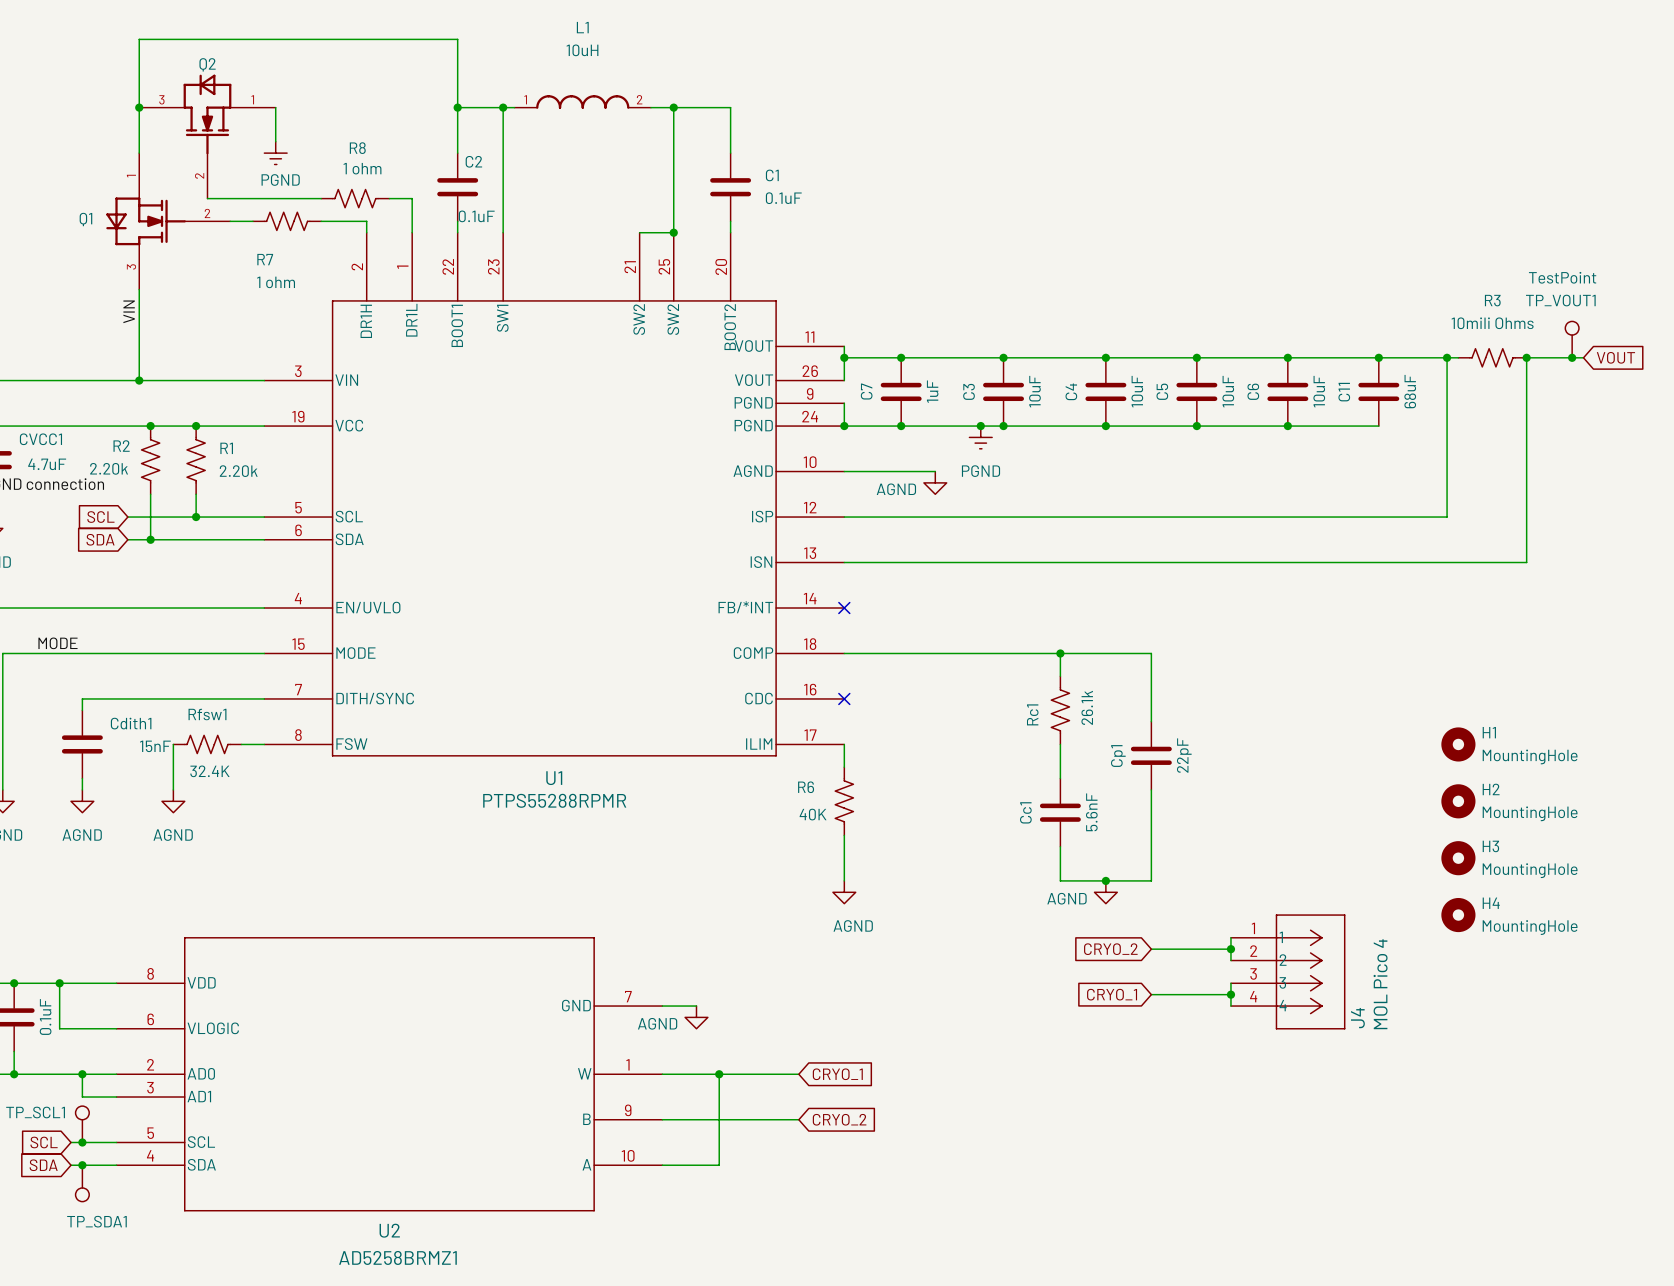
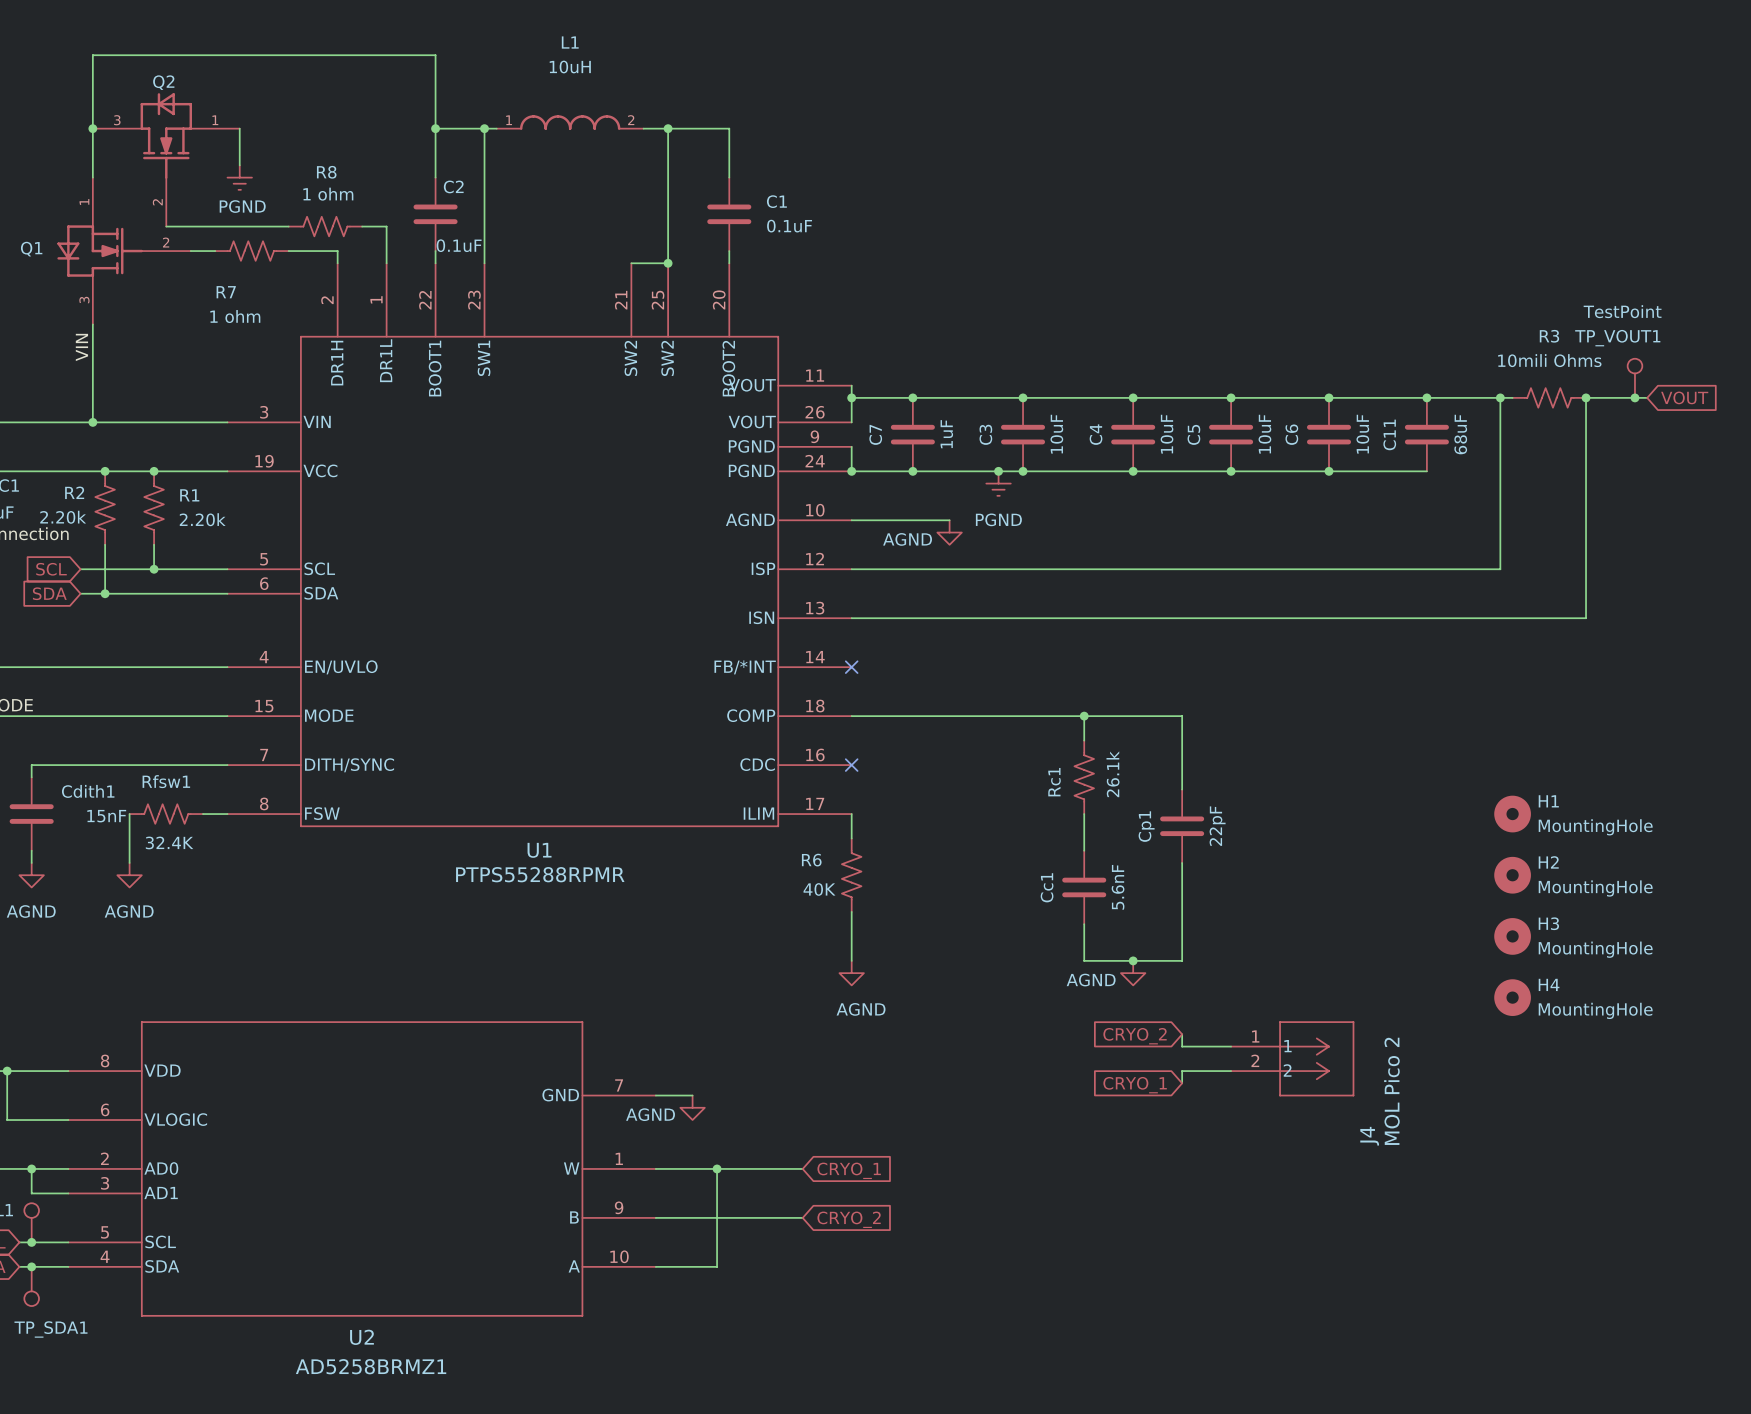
J4 symbol: [1230, 914, 1346, 1030] -> [1231, 1021, 1355, 1097]
wire: (1230, 937) (1230, 960) -> none
wire: (1151, 949) (1230, 949) -> (1182, 1034) (1182, 1046) (1231, 1046)
junction: (1230, 949) -> none
wire: (1230, 983) (1230, 1006) -> none
J4 value: MOL Pico 4 (1380, 984) -> MOL Pico 2 (1391, 1091)
wire: (1151, 994) (1230, 994) -> (1182, 1083) (1182, 1071) (1231, 1071)
junction: (1230, 994) -> none
J4 name position: J4 (1357, 1018) -> J4 (1369, 1136)

